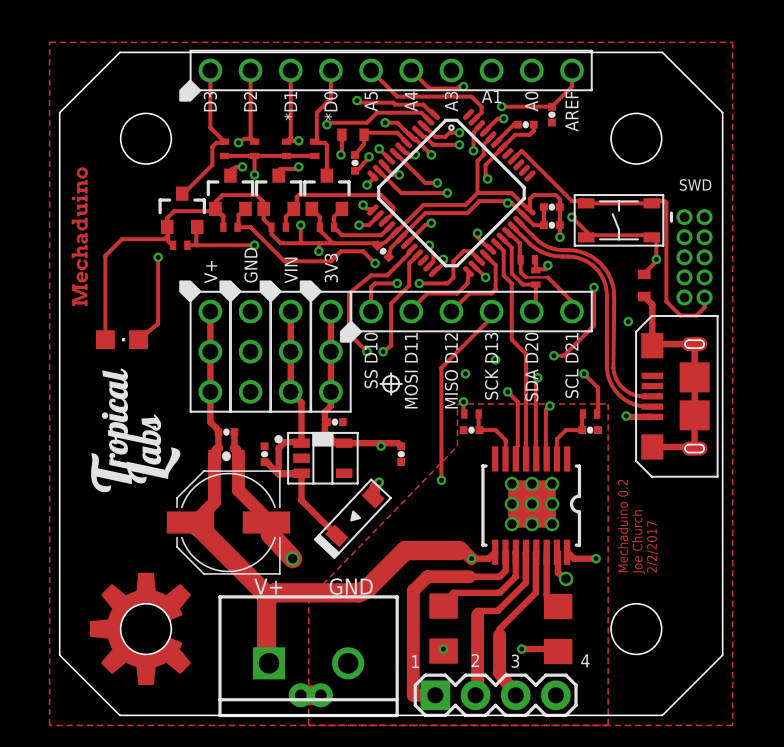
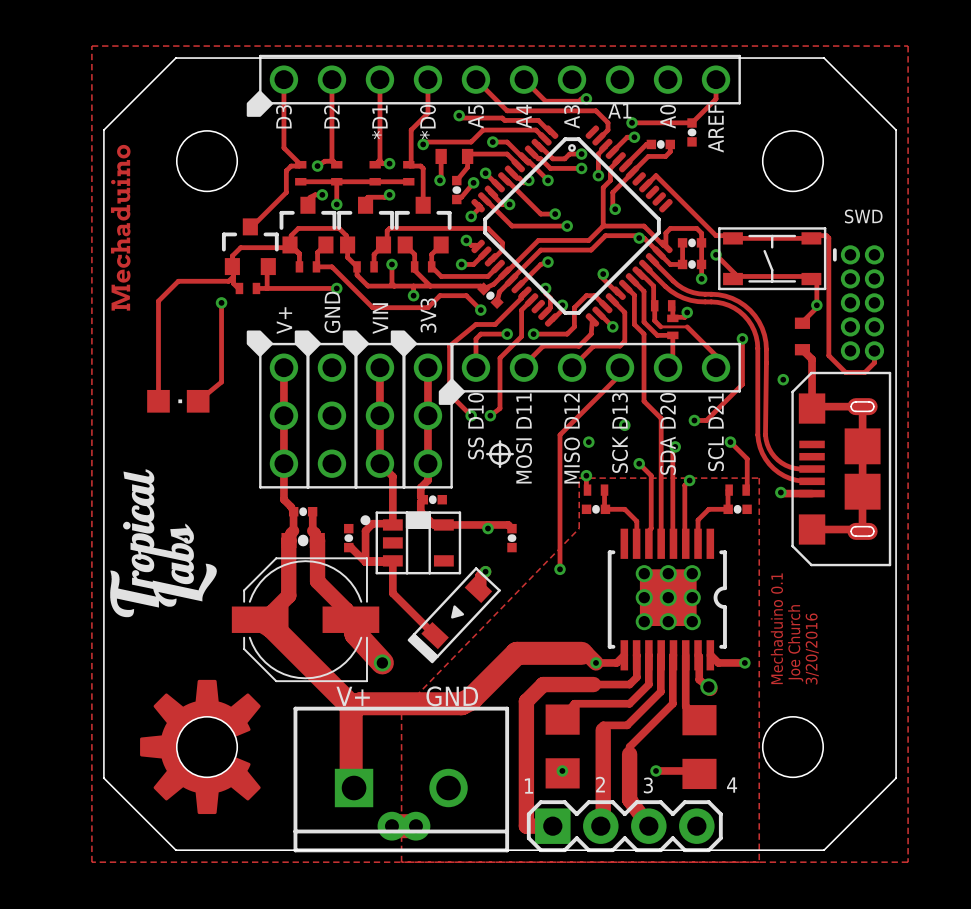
drawing position: (79, 236) -> (120, 227)
drawing position: (135, 430) -> (163, 543)
text: Mechaduino 0.2 (622, 526) -> Mechaduino 0.1 (776, 628)
text: 2/2/2017 (652, 546) -> 3/20/2016 (812, 648)

